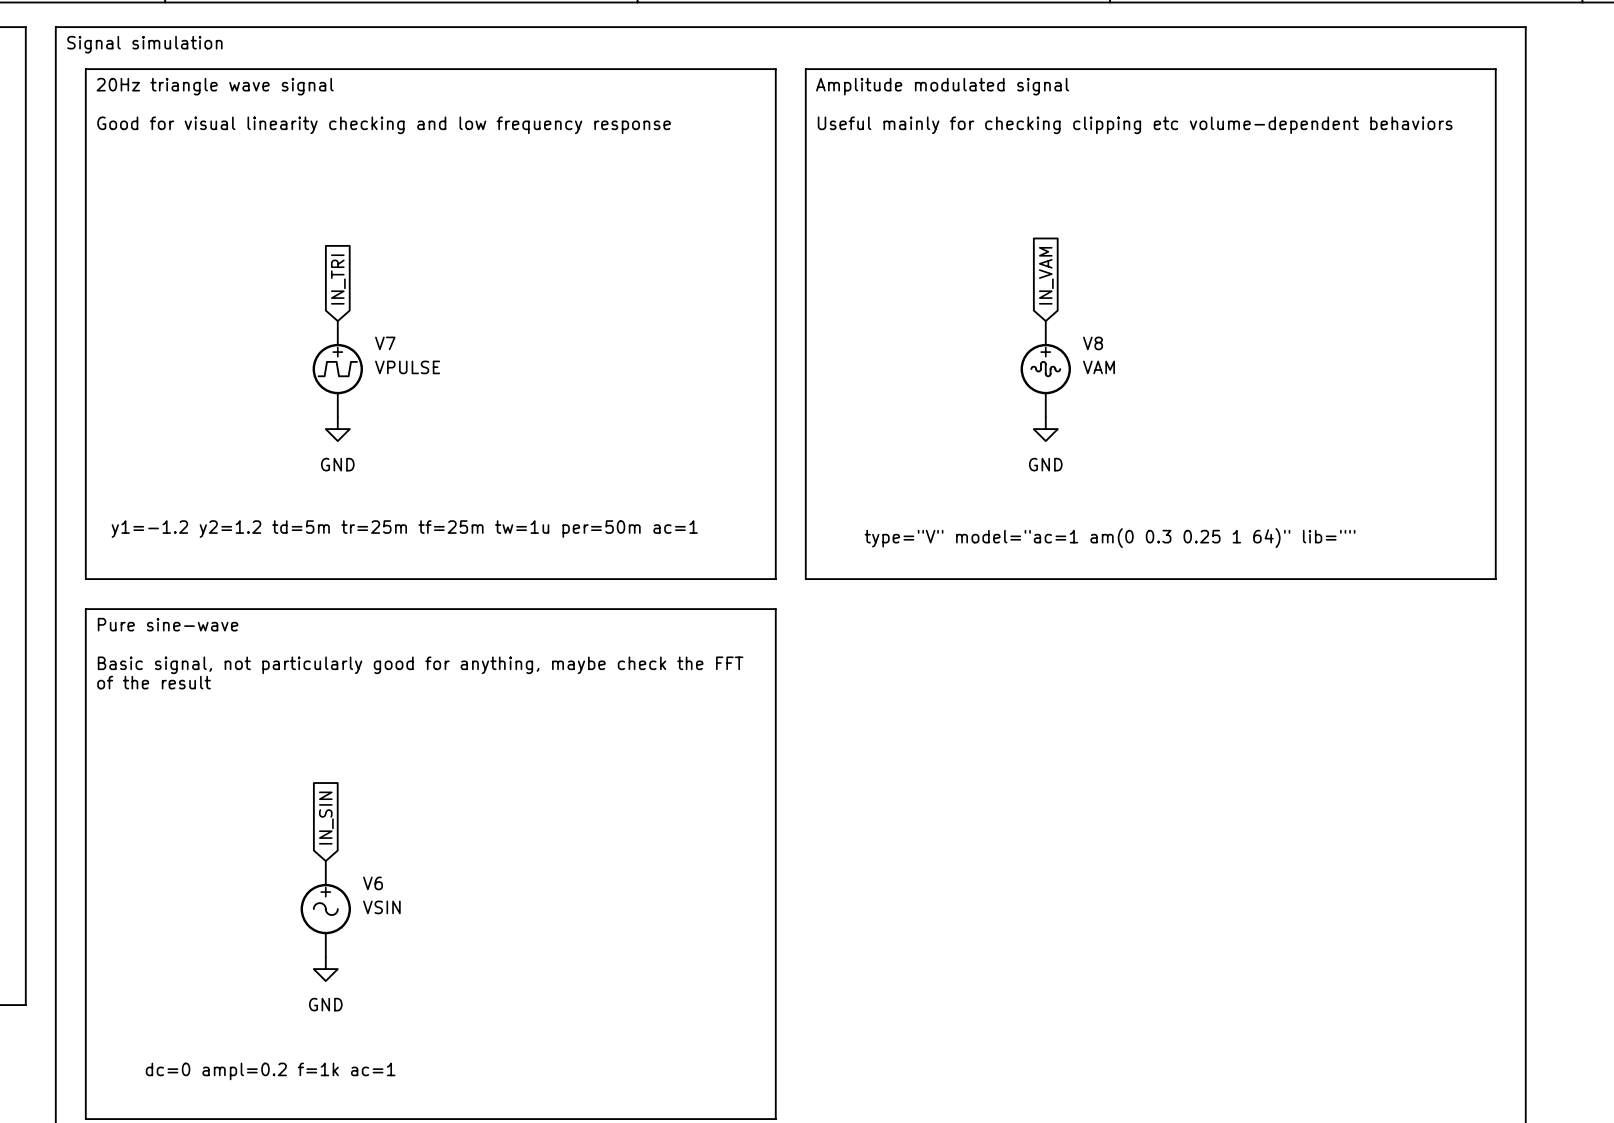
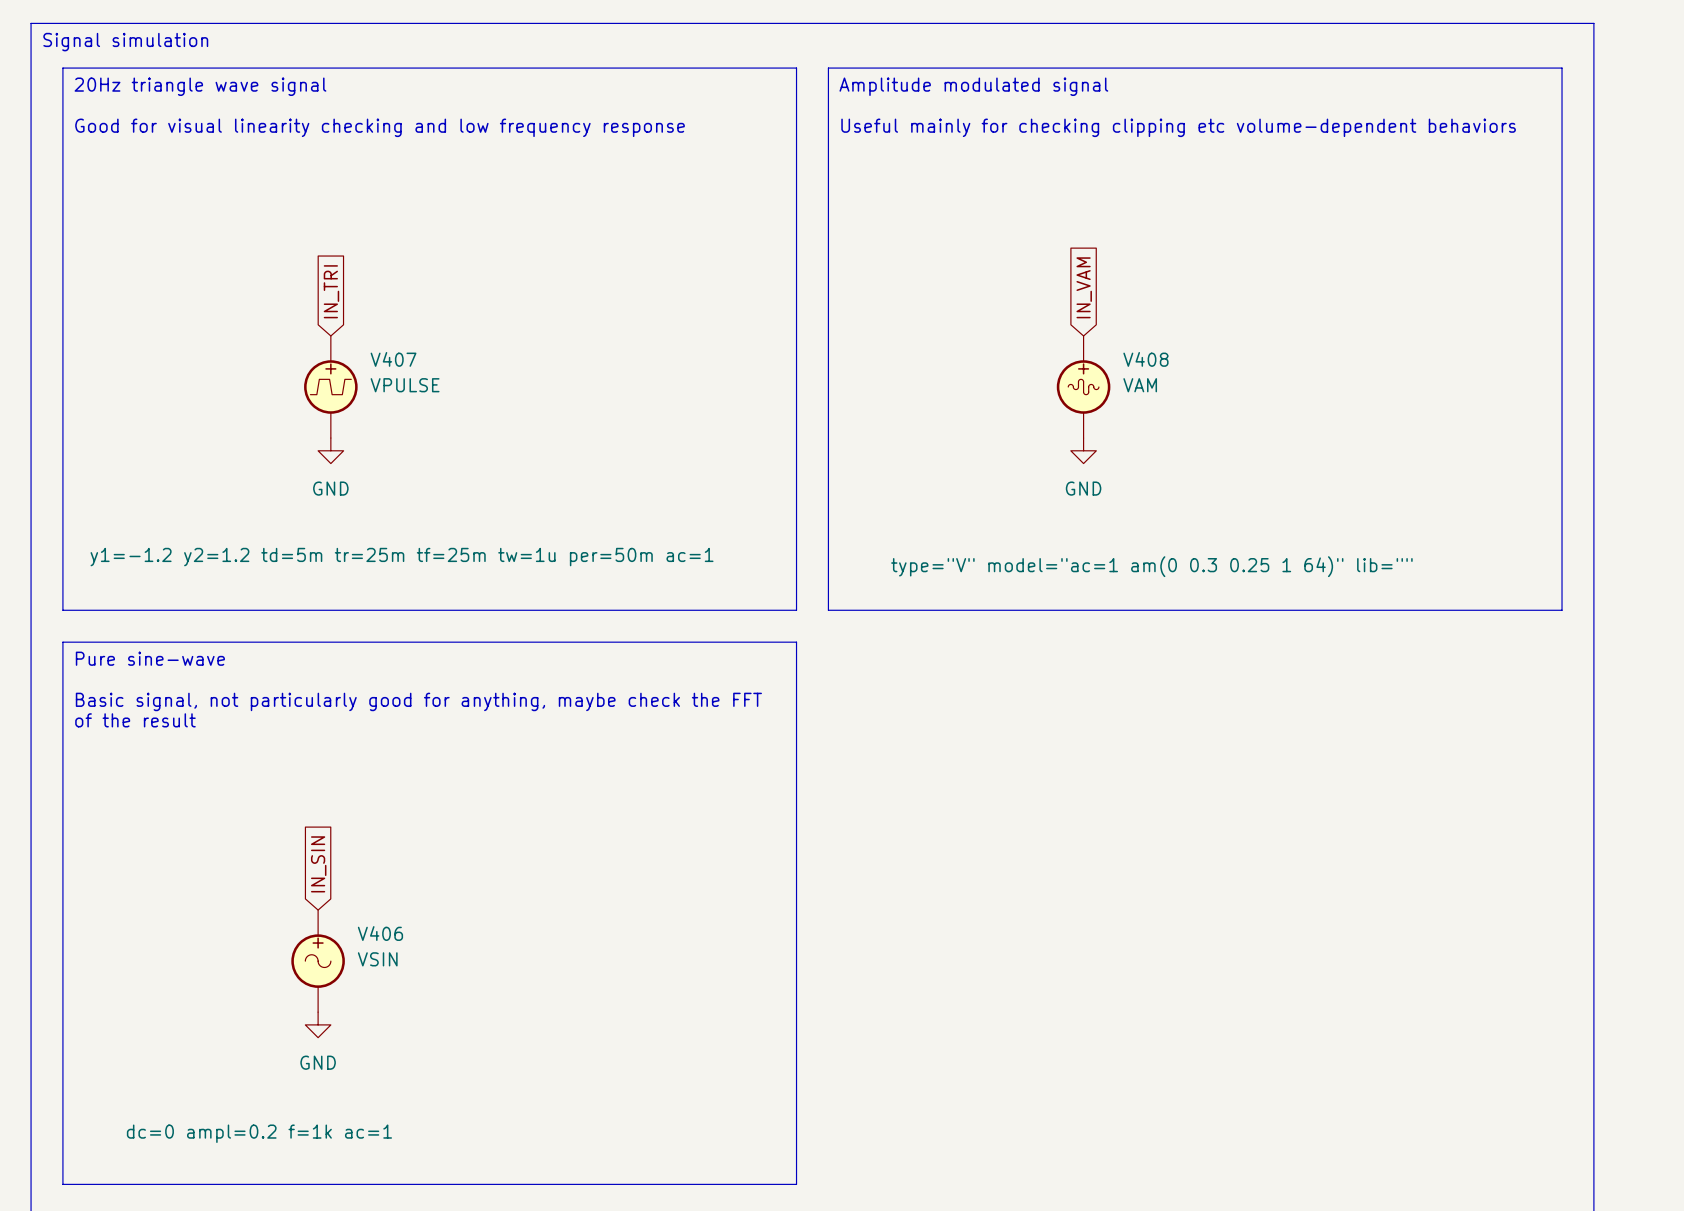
V7 name: V7 (385, 343) -> V407 (393, 359)
V8 name: V8 (1093, 343) -> V408 (1145, 359)
V6 name: V6 (373, 883) -> V406 (380, 933)

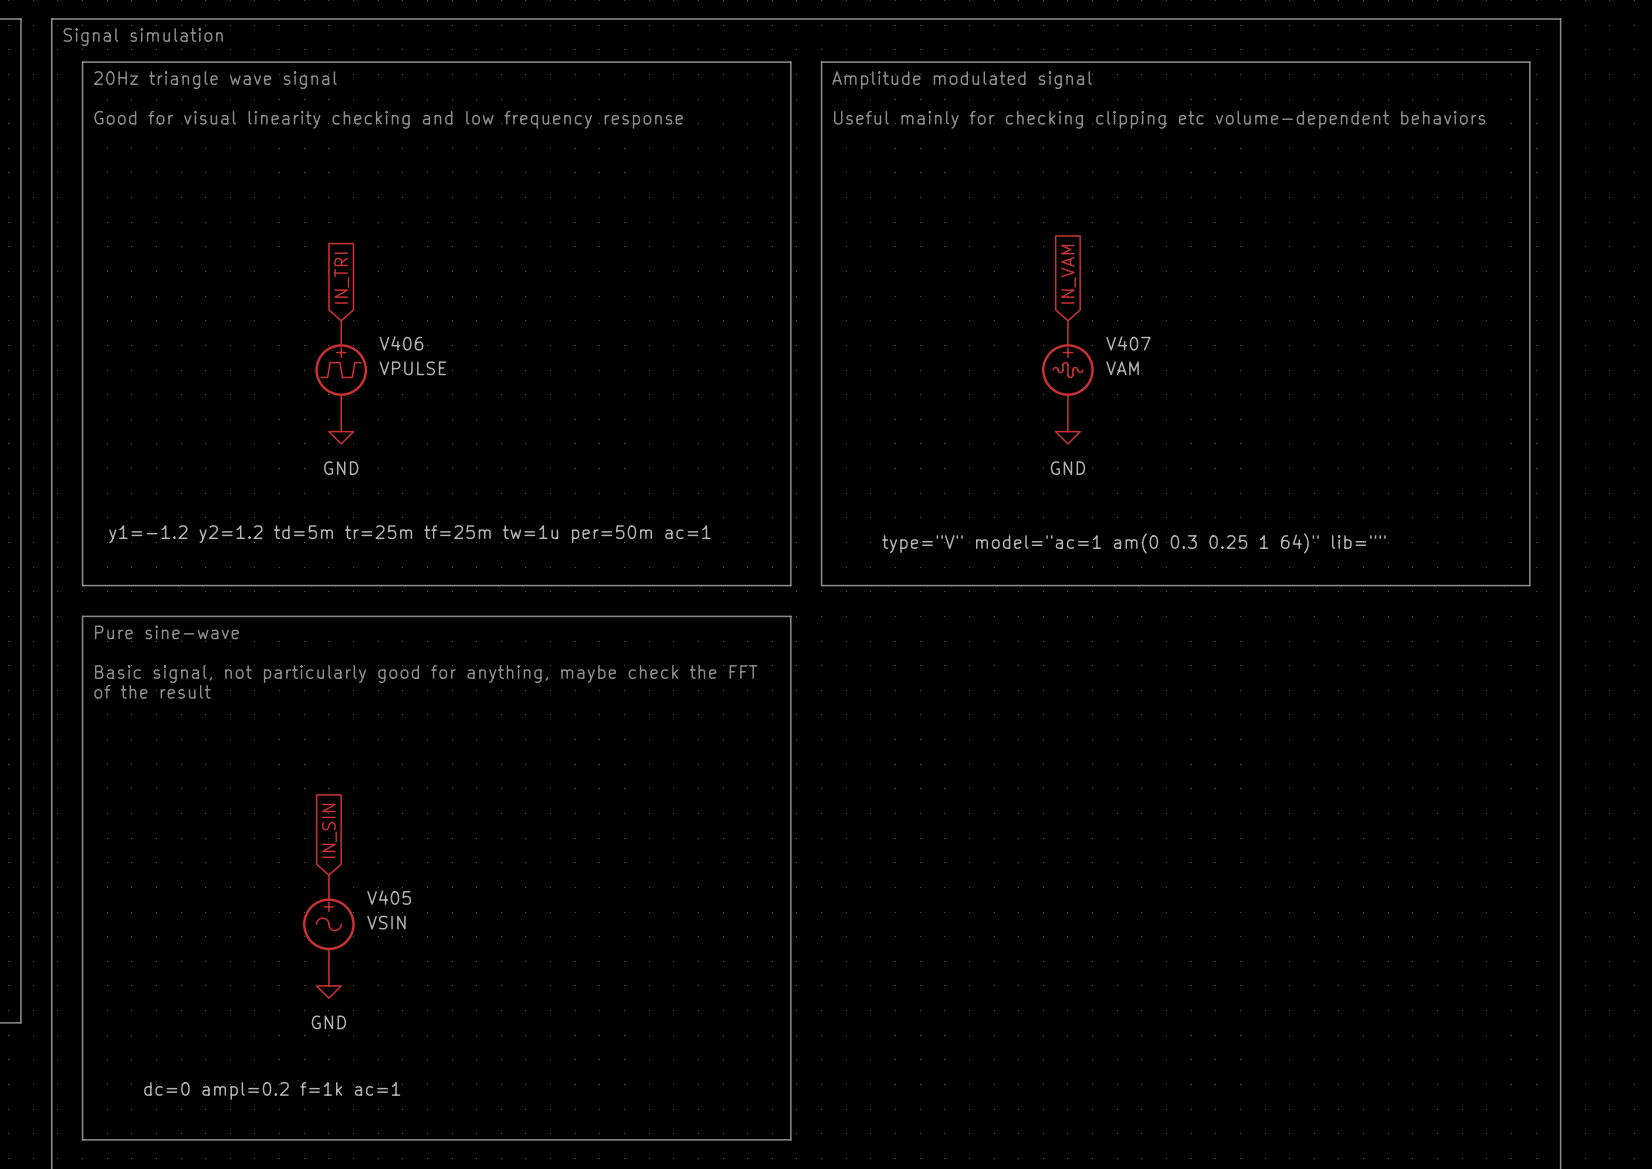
V407 name: V407 (393, 359) -> V406 (401, 343)
V408 name: V408 (1145, 359) -> V407 (1128, 343)
V406 name: V406 (380, 933) -> V405 (389, 897)

